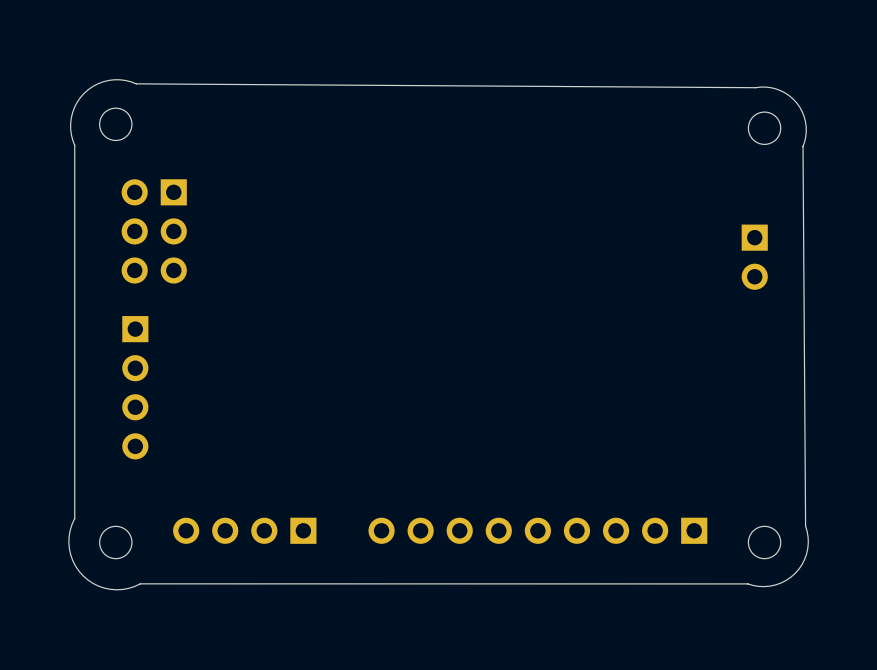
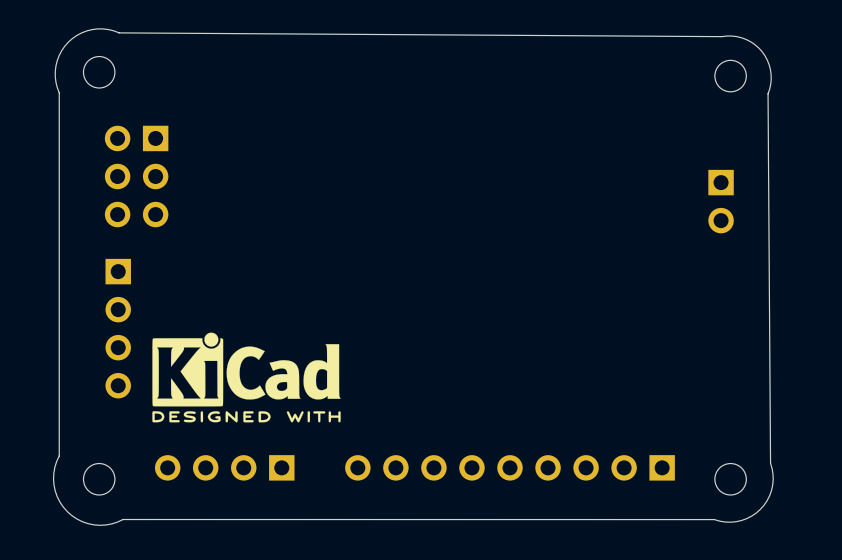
drawing: none -> [152, 332, 341, 423]

